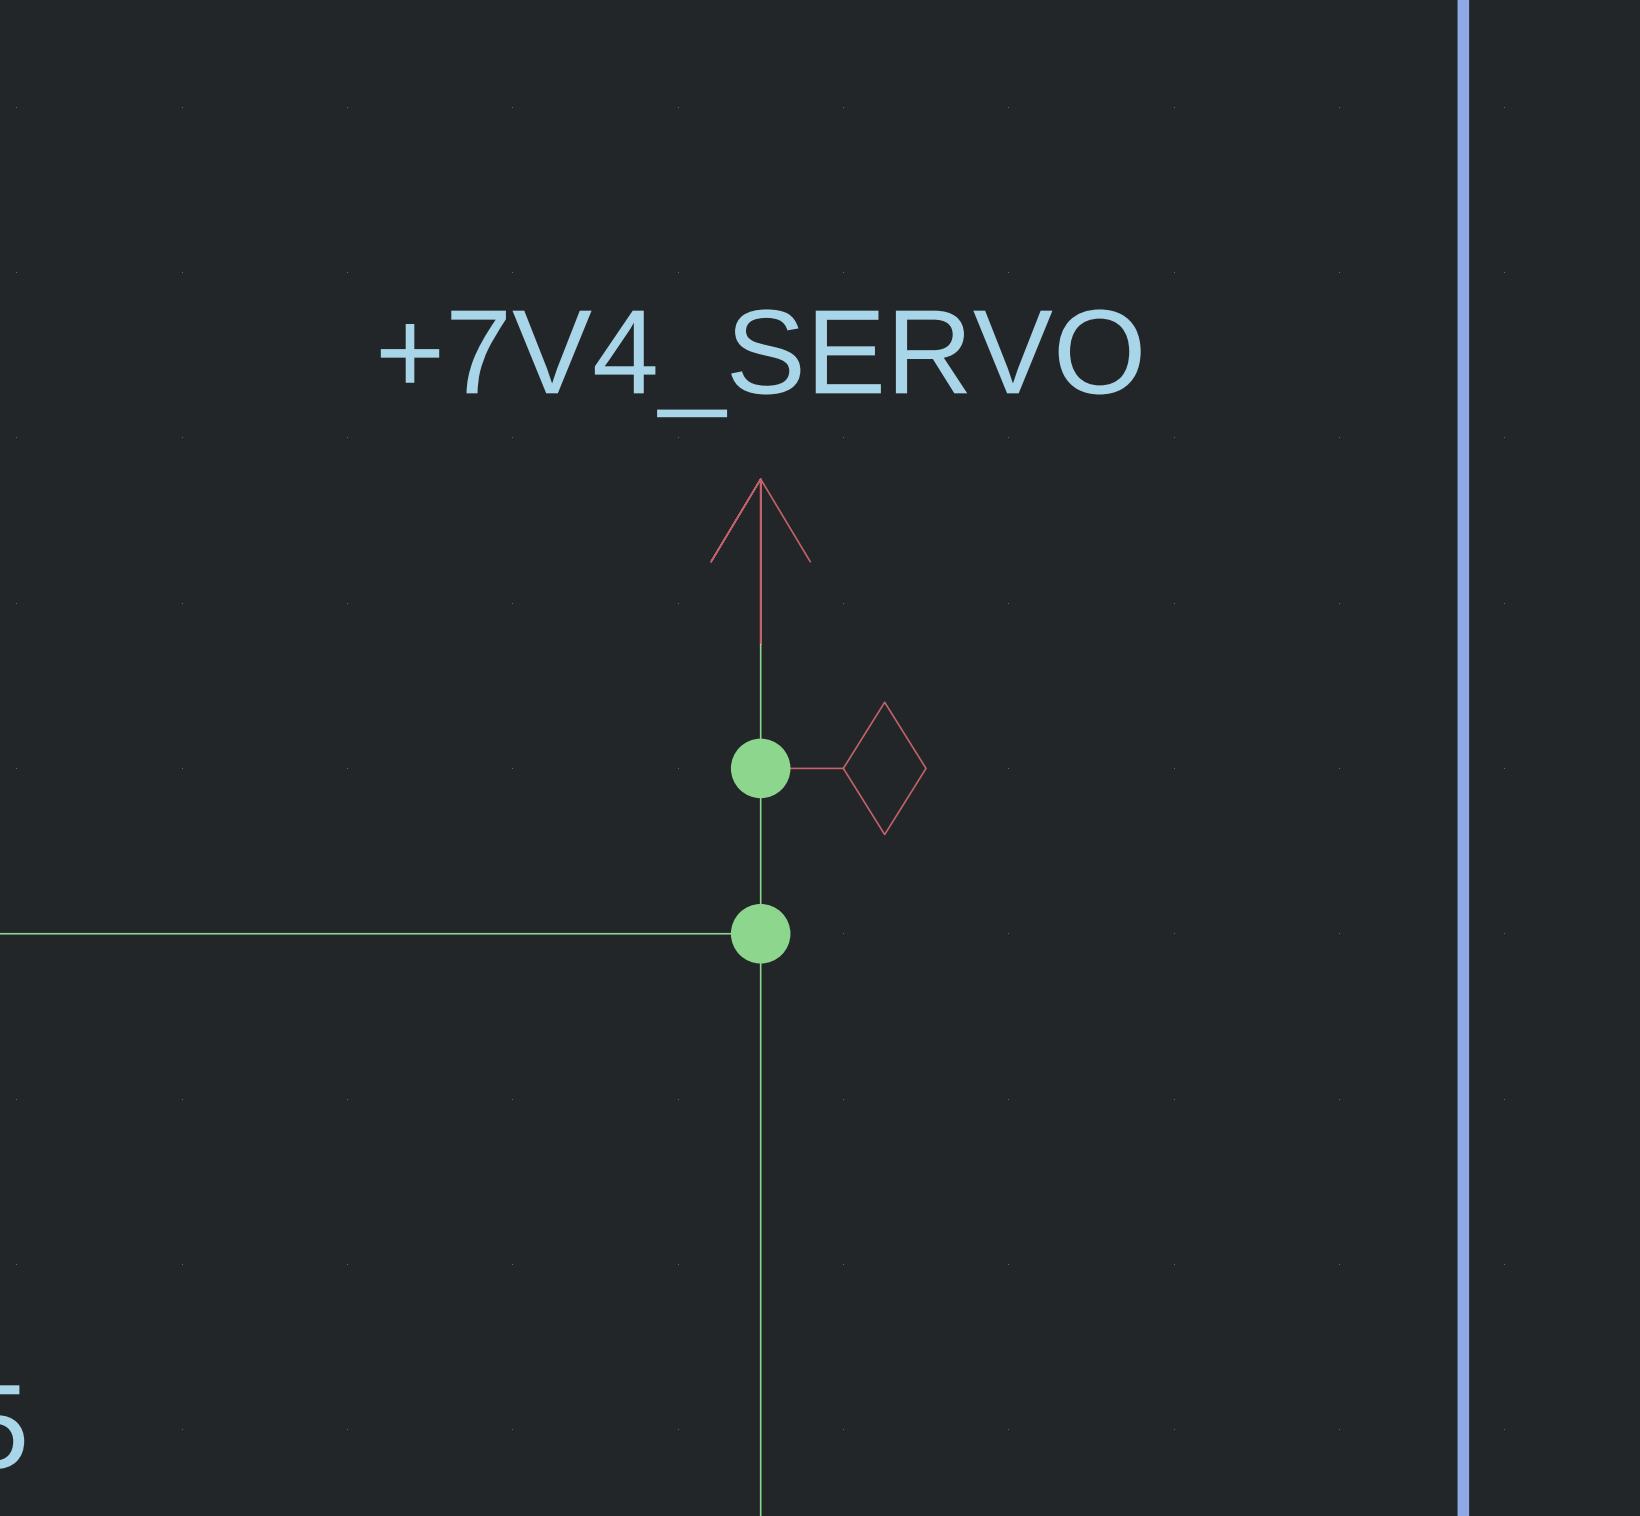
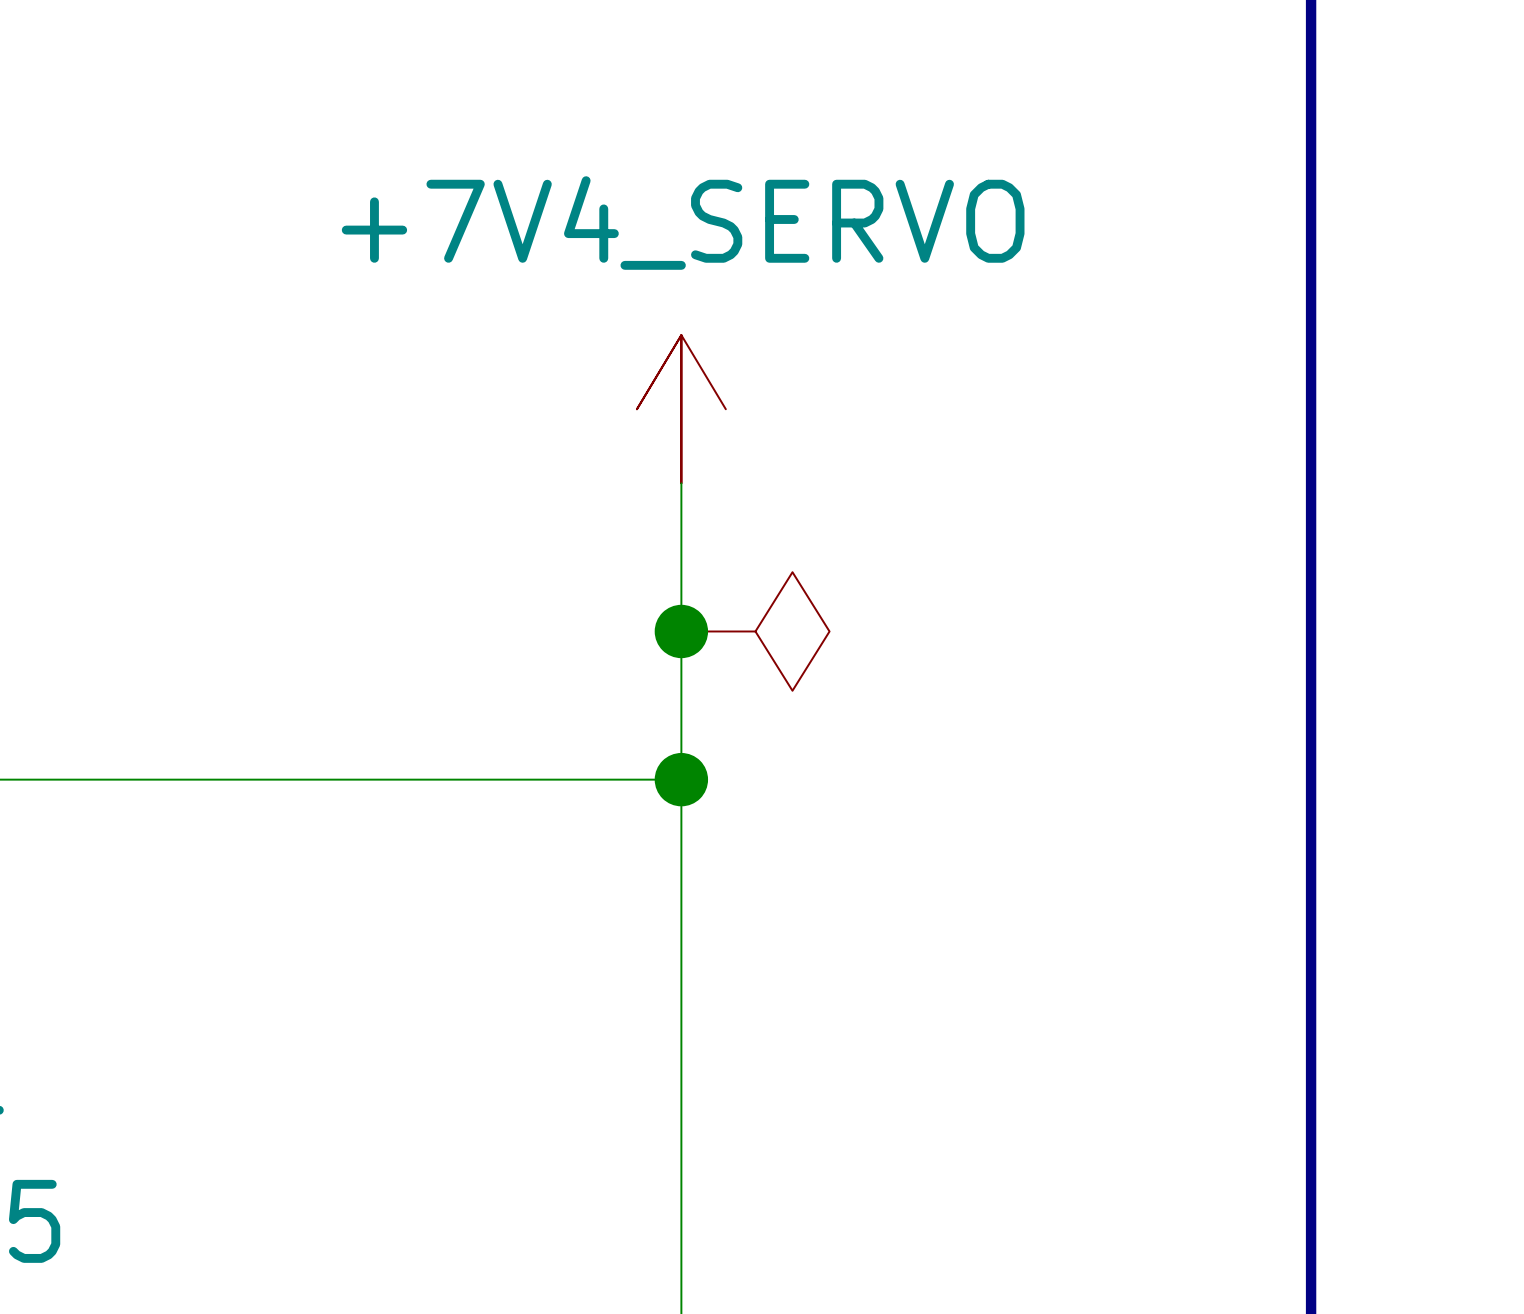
power symbol position: +7V4_SERVO (760, 561) -> +7V4_SERVO (681, 409)

